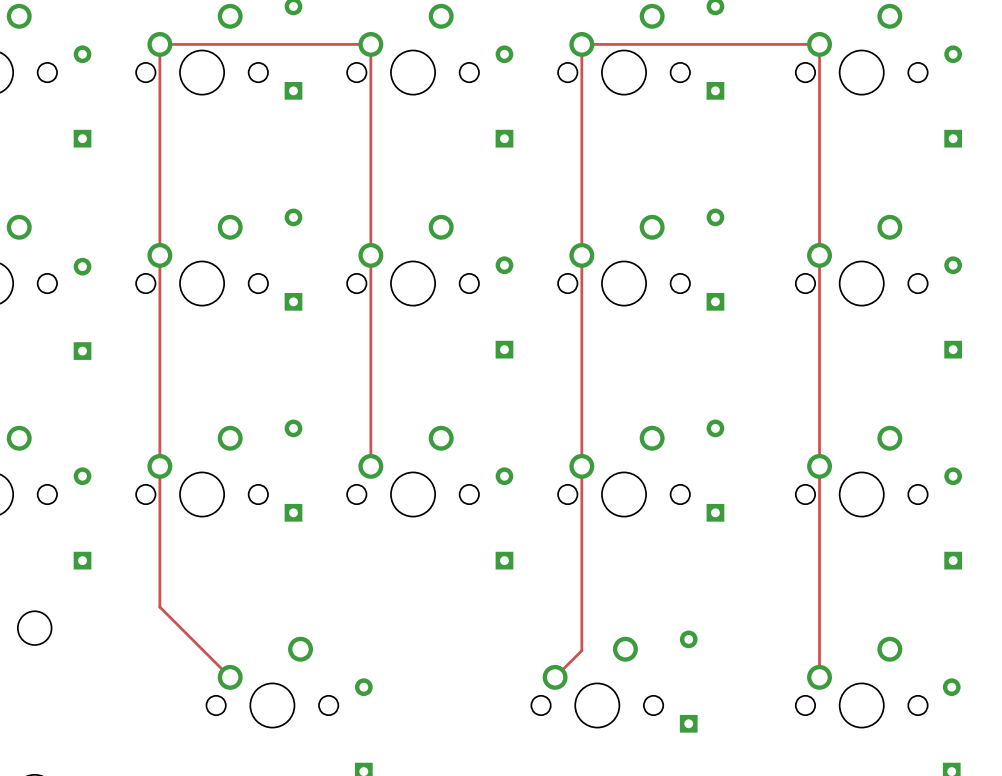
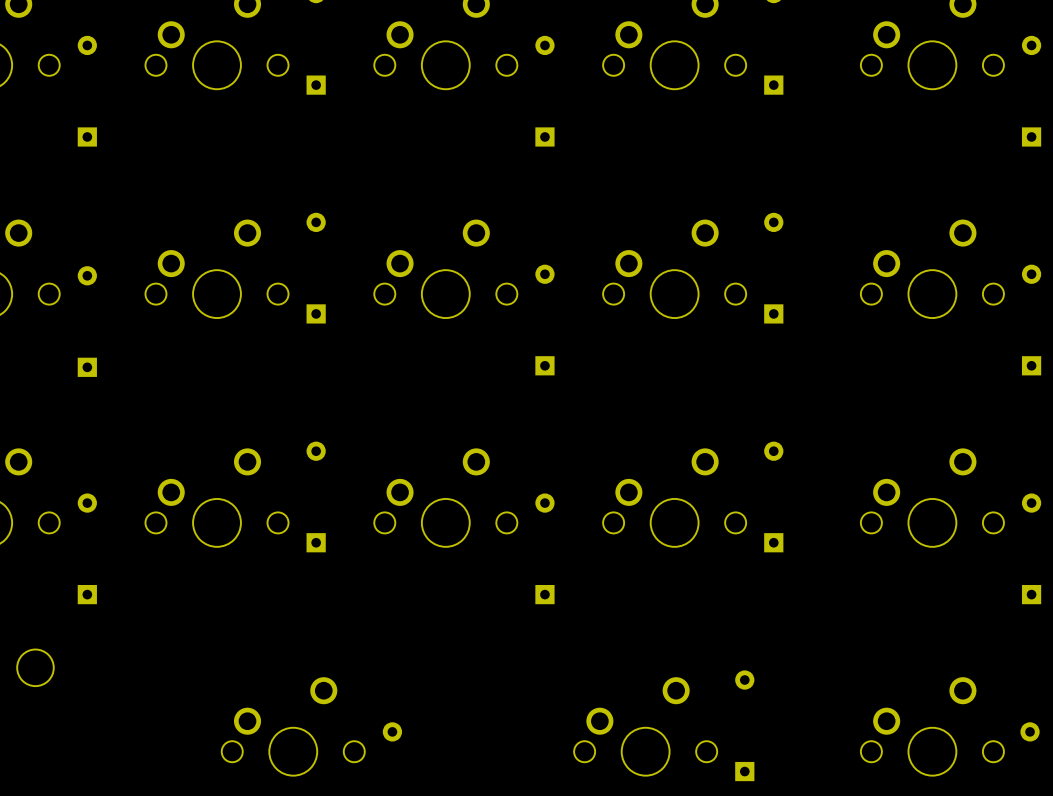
track: (370, 466) (370, 44) (159, 44) (159, 607) (230, 677) -> none
track: (555, 677) (581, 650) (581, 44) (819, 44) (819, 677) -> none

